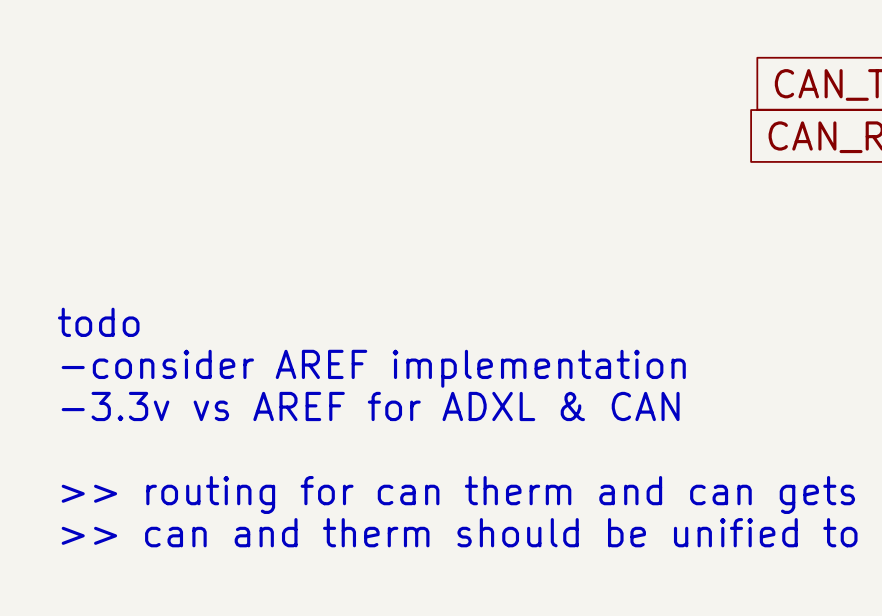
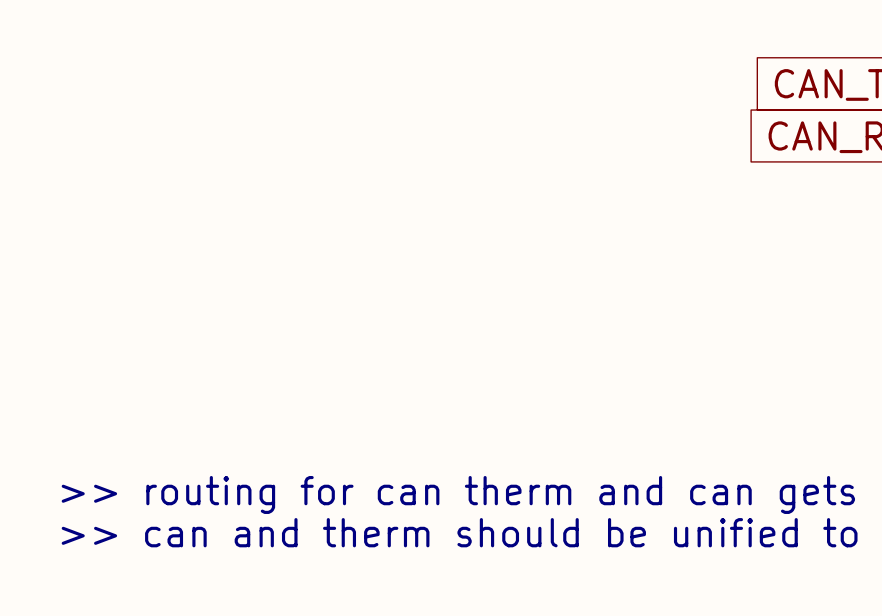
text: todo (98, 322) -> none
text: -consider AREF implementation (373, 368) -> none
text: -3.3v vs AREF for ADXL & CAN (370, 406) -> none

